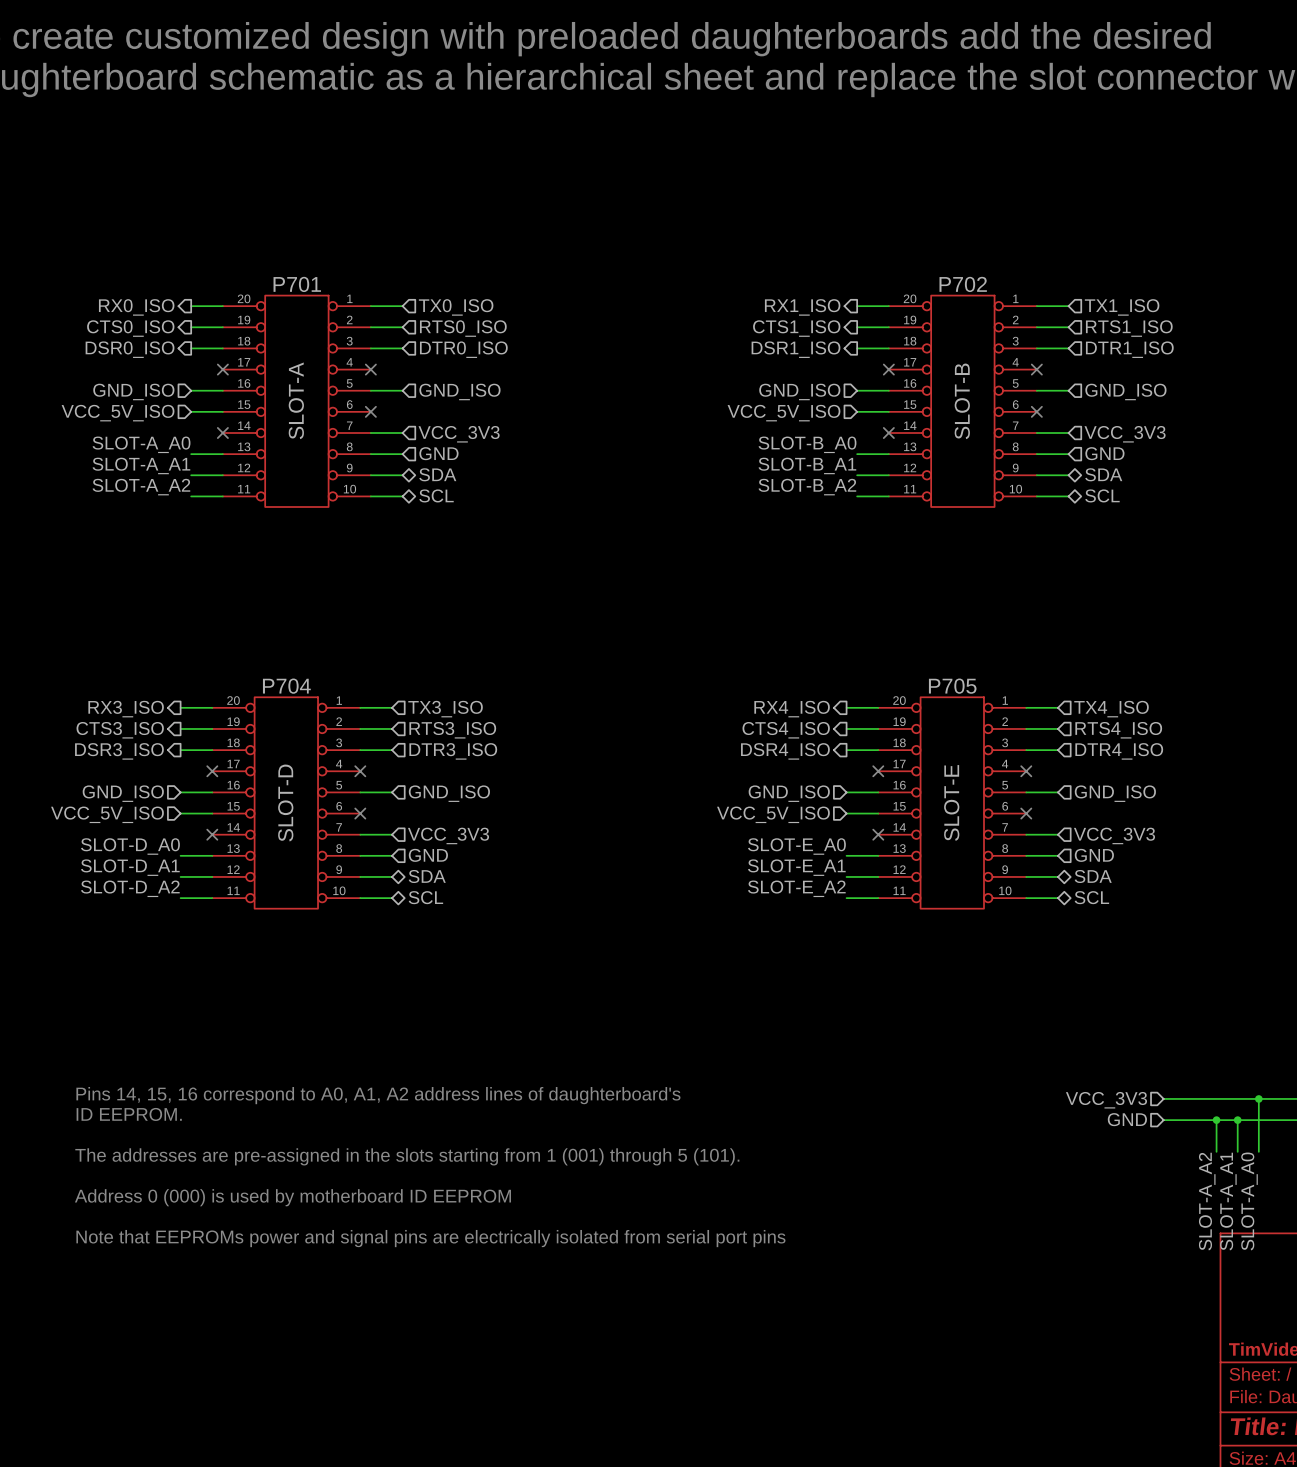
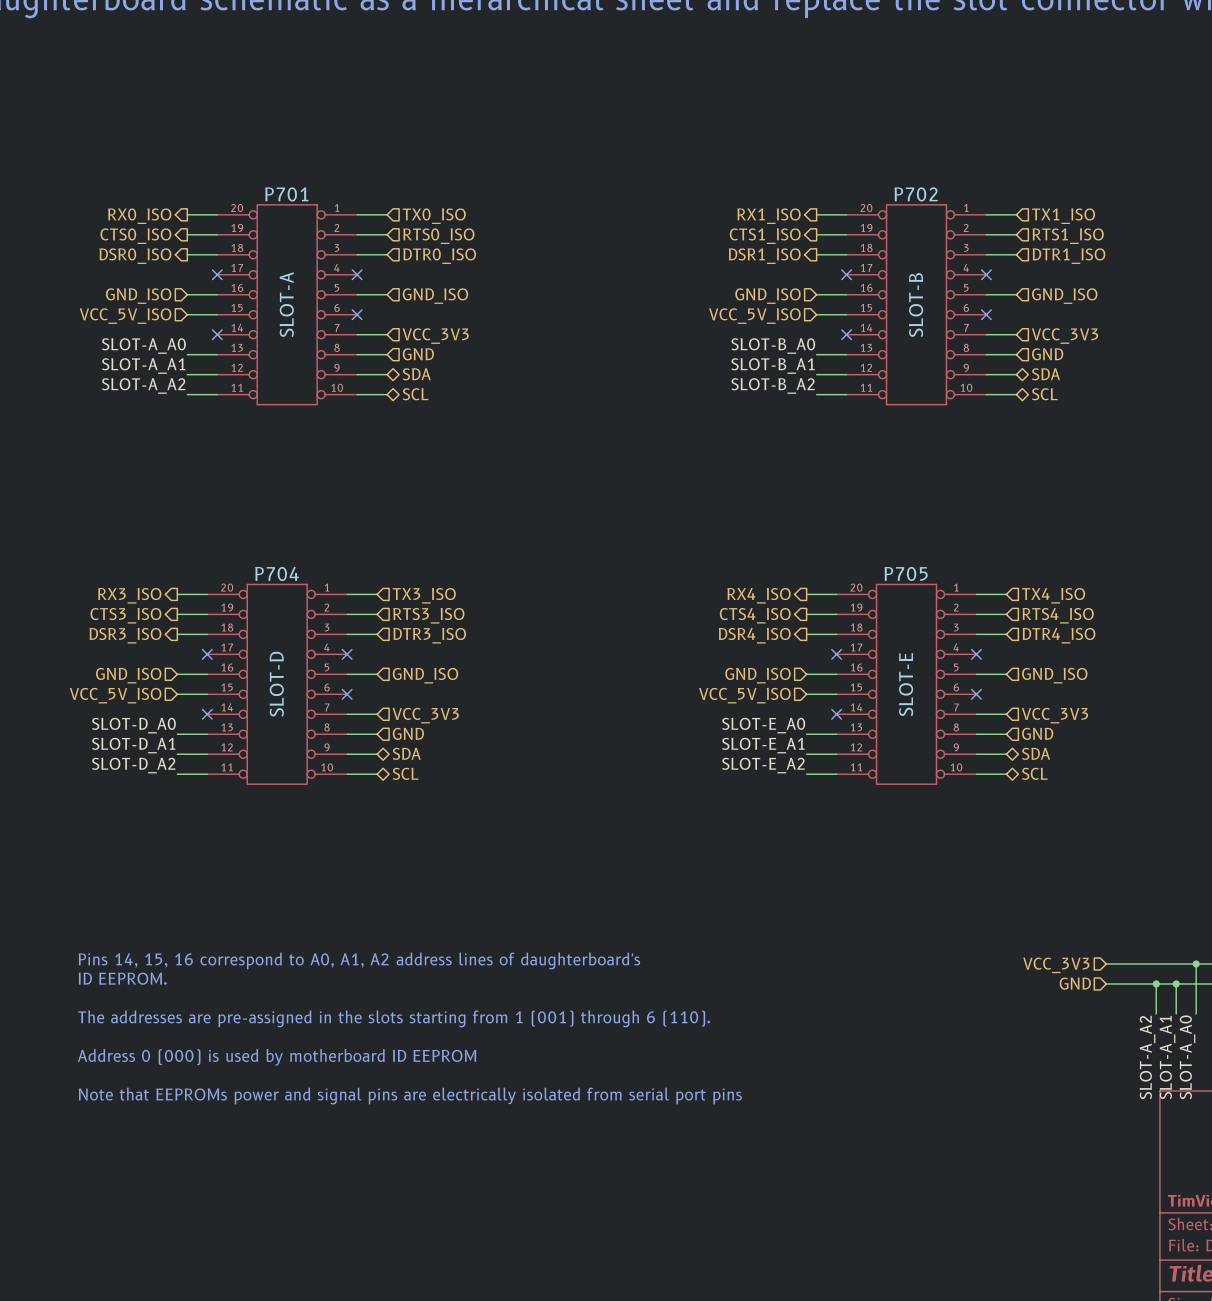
text: The addresses are pre-assigned in the slots starting from 1 (001) through 5 (101). (407, 1156) -> The addresses are pre-assigned in the slots starting from 1 (001) through 6 (110). (394, 1018)

